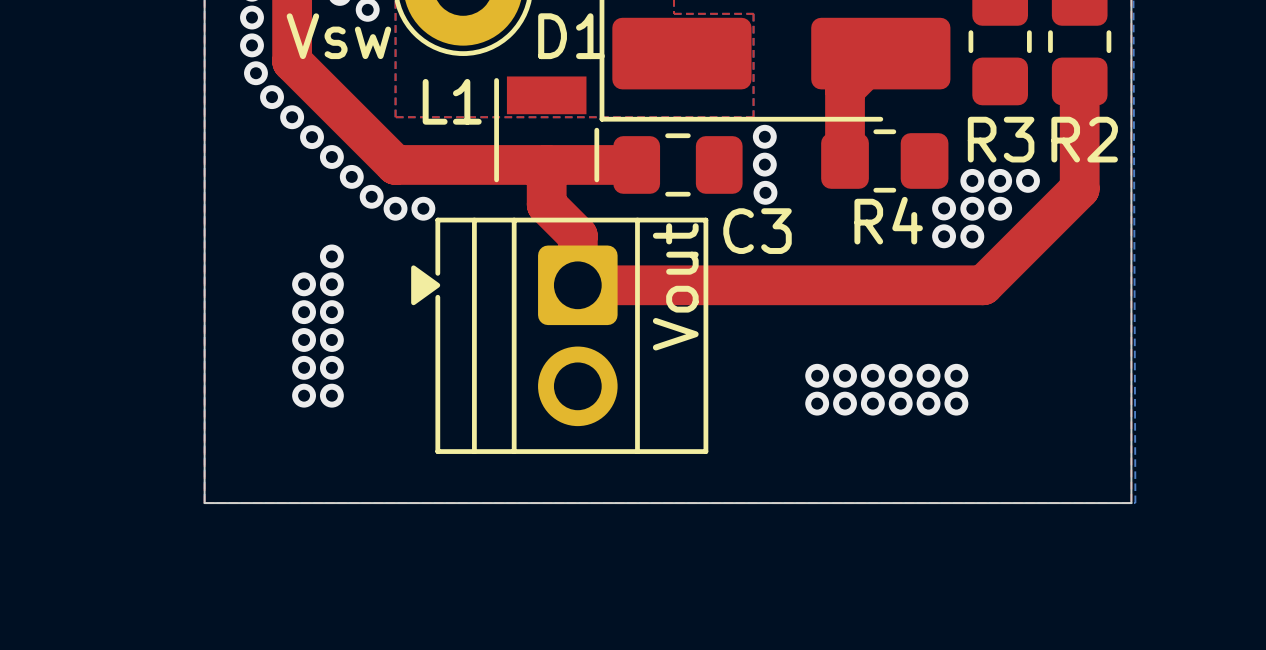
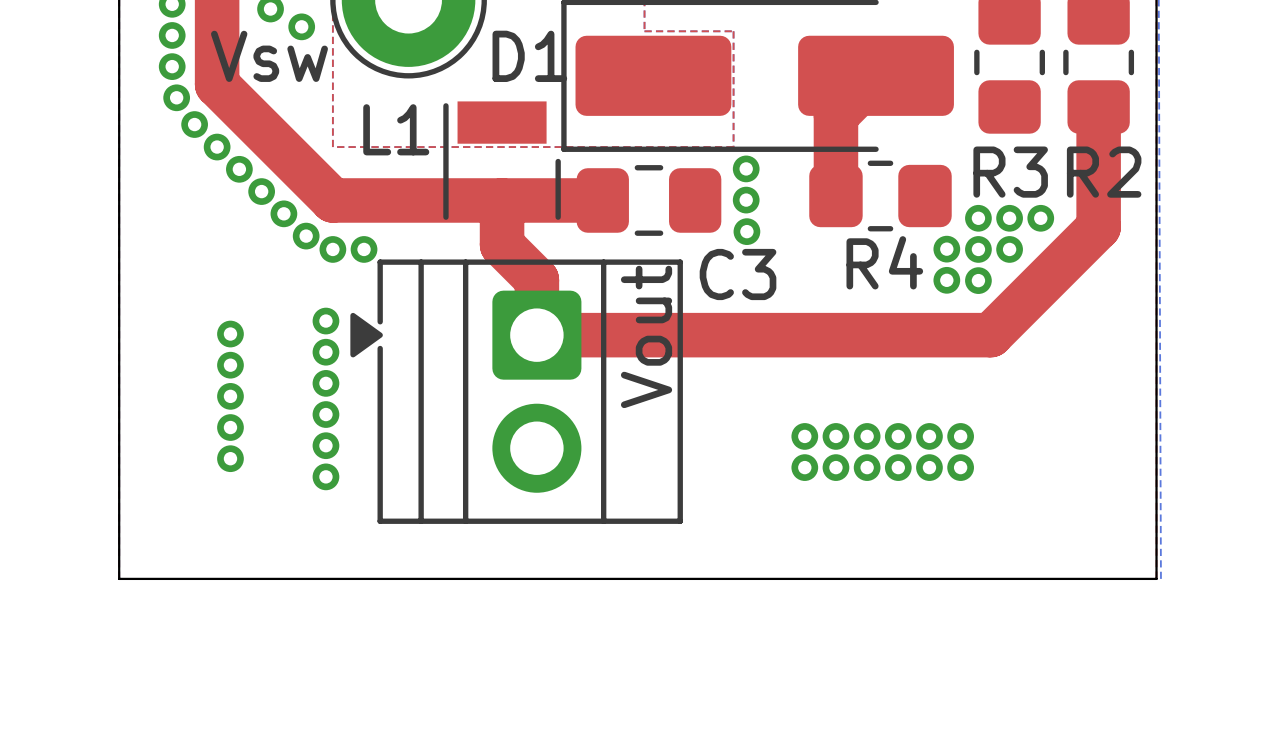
via: (331, 256) -> none
via: none -> (325, 321)
via: (331, 284) -> none
via: none -> (325, 352)
via: (331, 312) -> none
via: none -> (325, 383)
via: (331, 339) -> none
via: none -> (325, 414)
via: (331, 367) -> none
via: none -> (325, 445)
via: (331, 395) -> none
via: none -> (325, 476)

